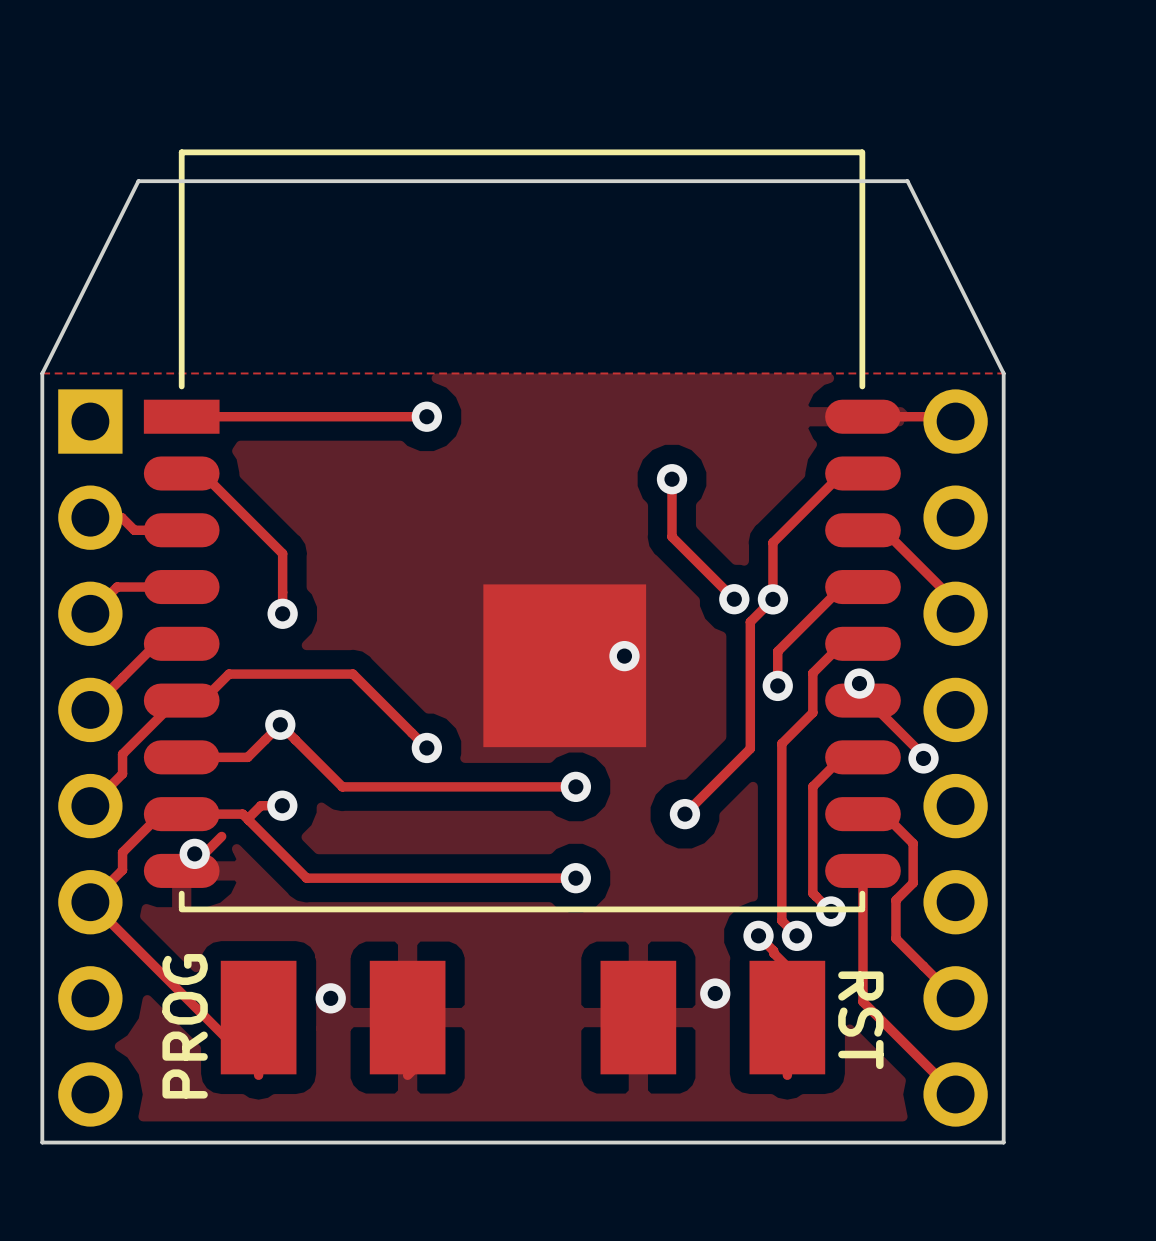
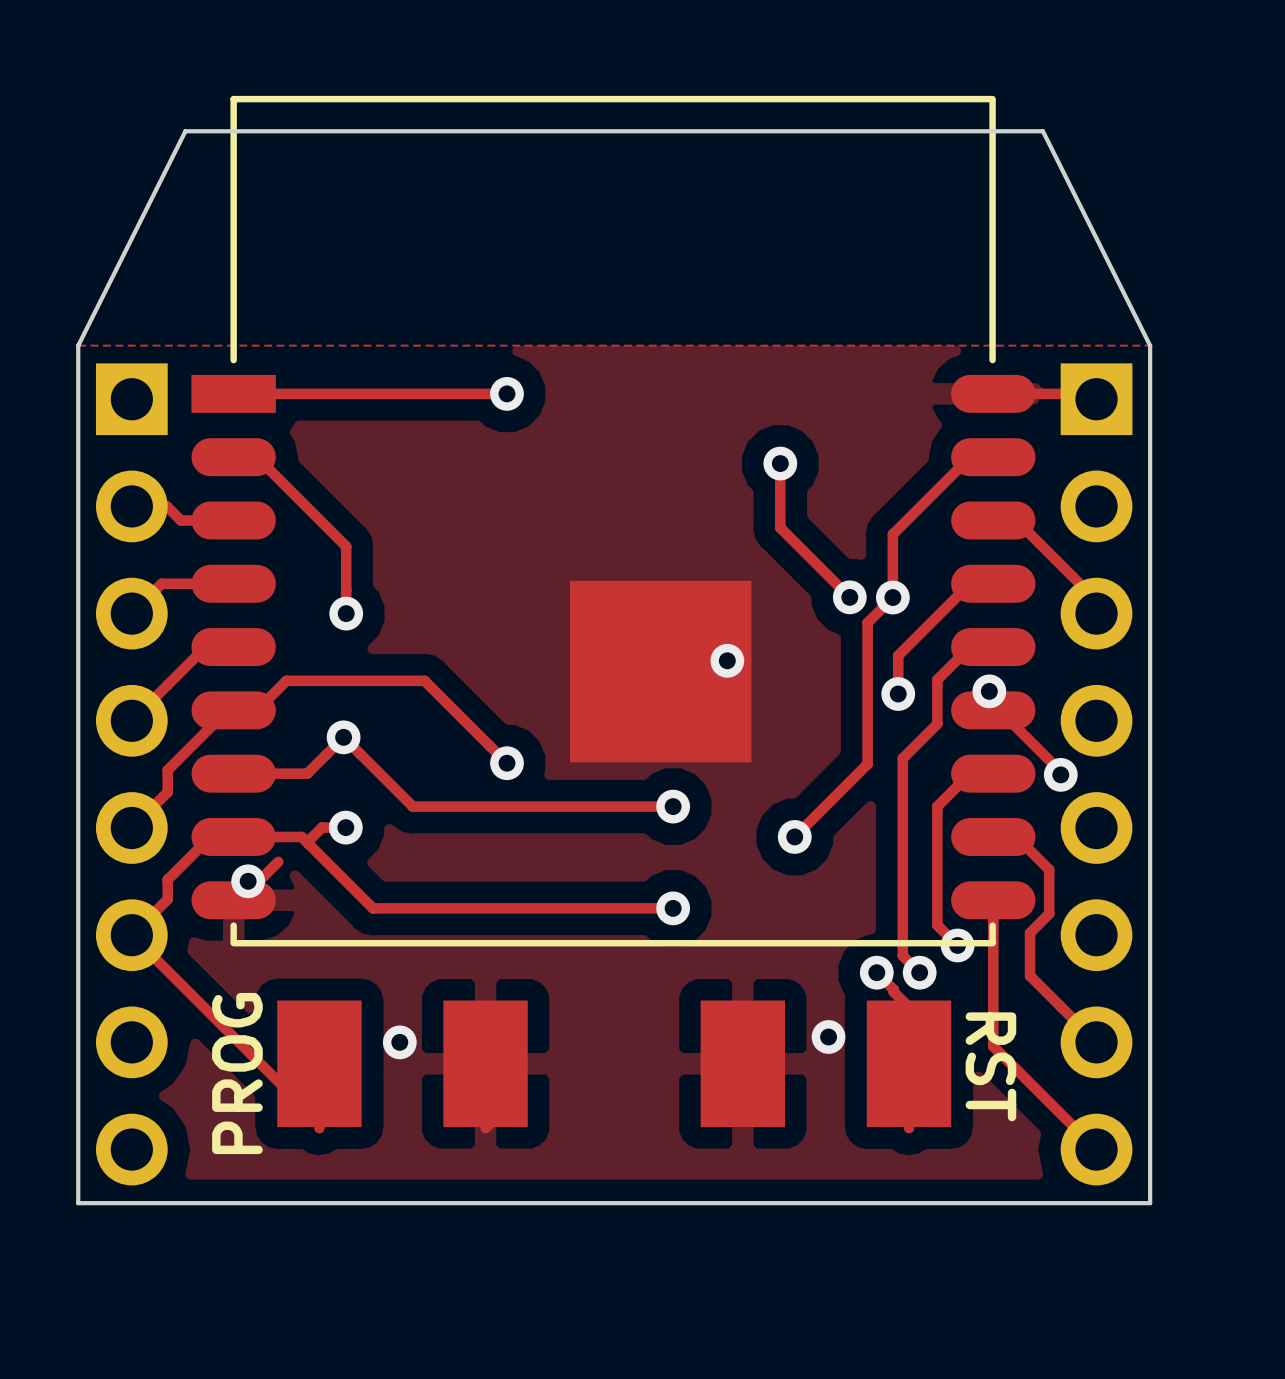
part footprint: [923, 389, 988, 1127] -> [1060, 363, 1133, 1186]

